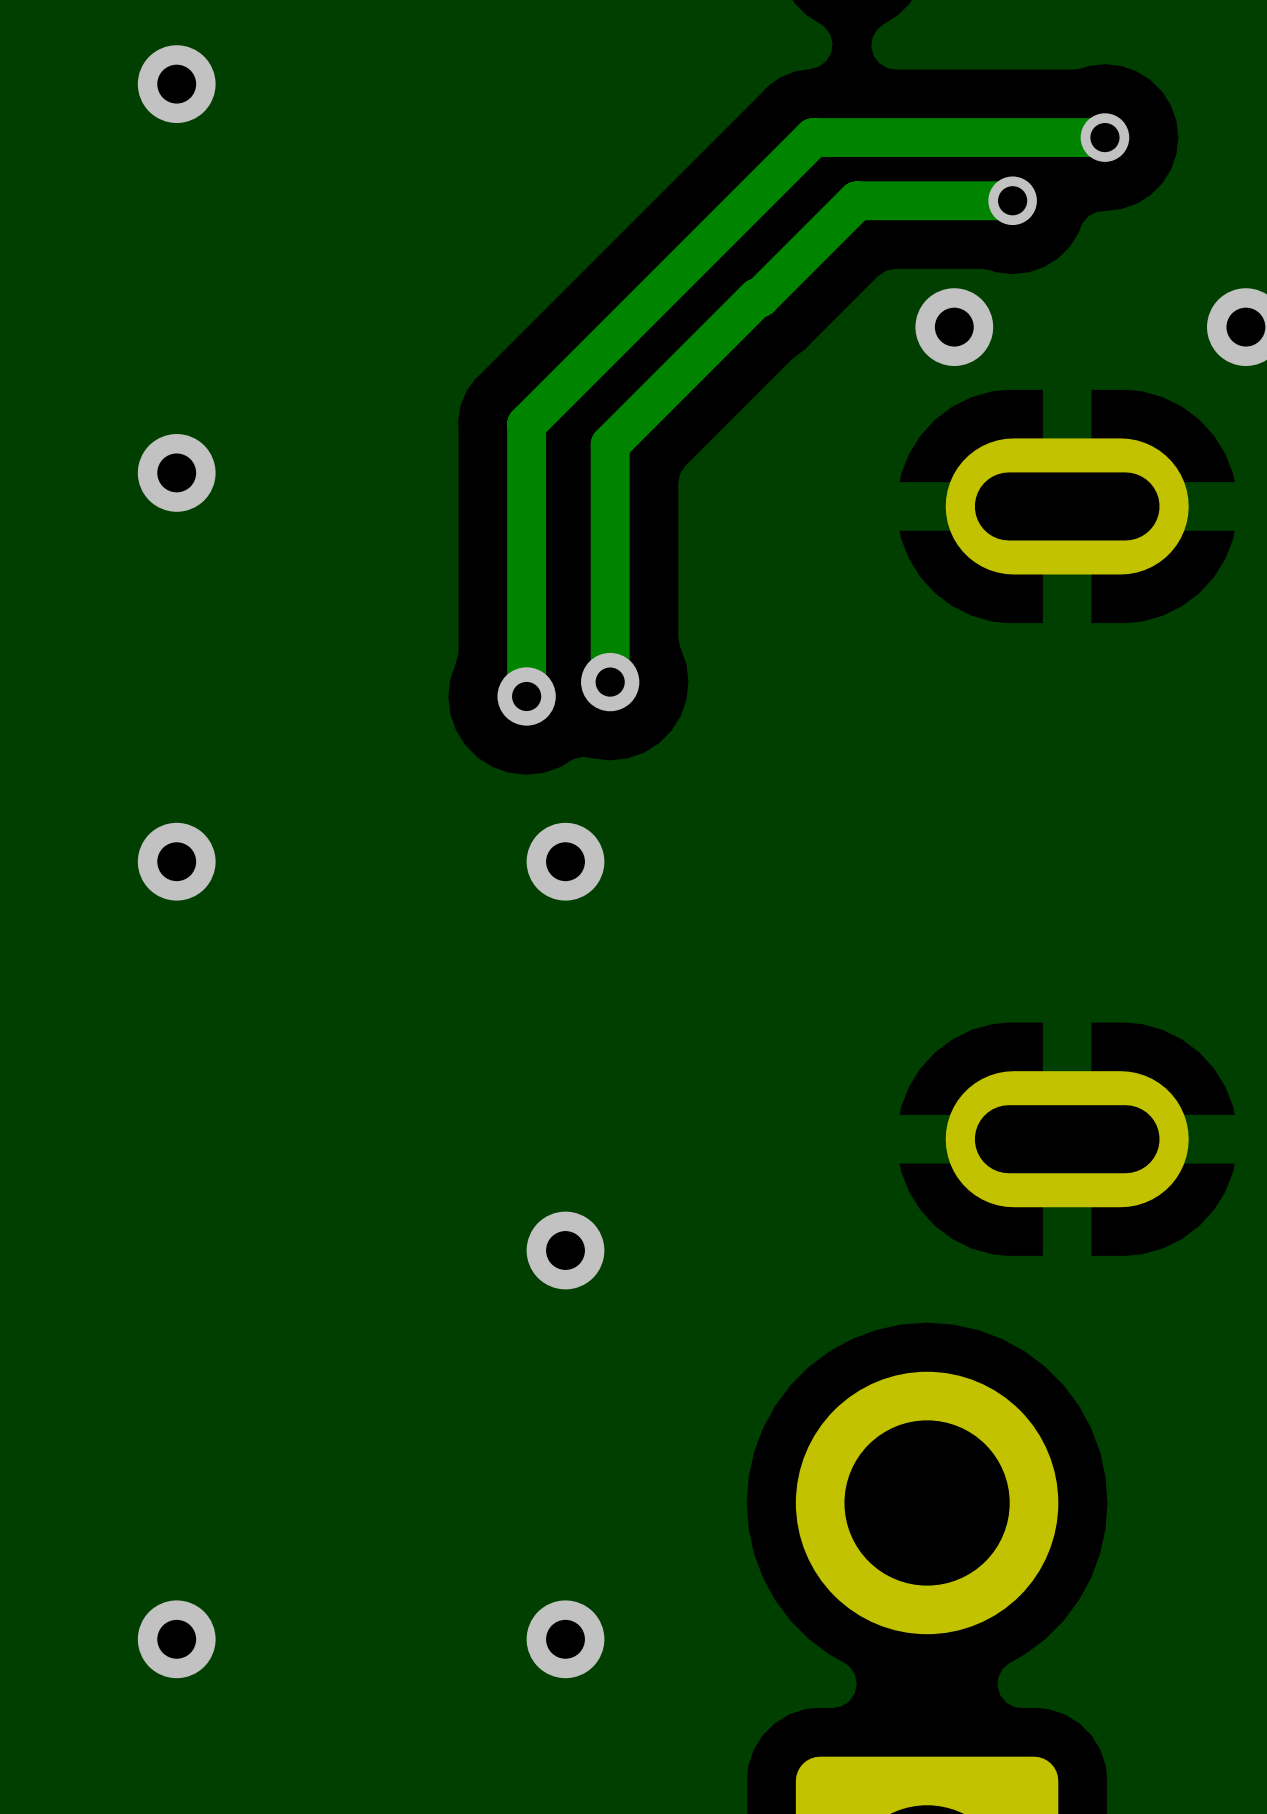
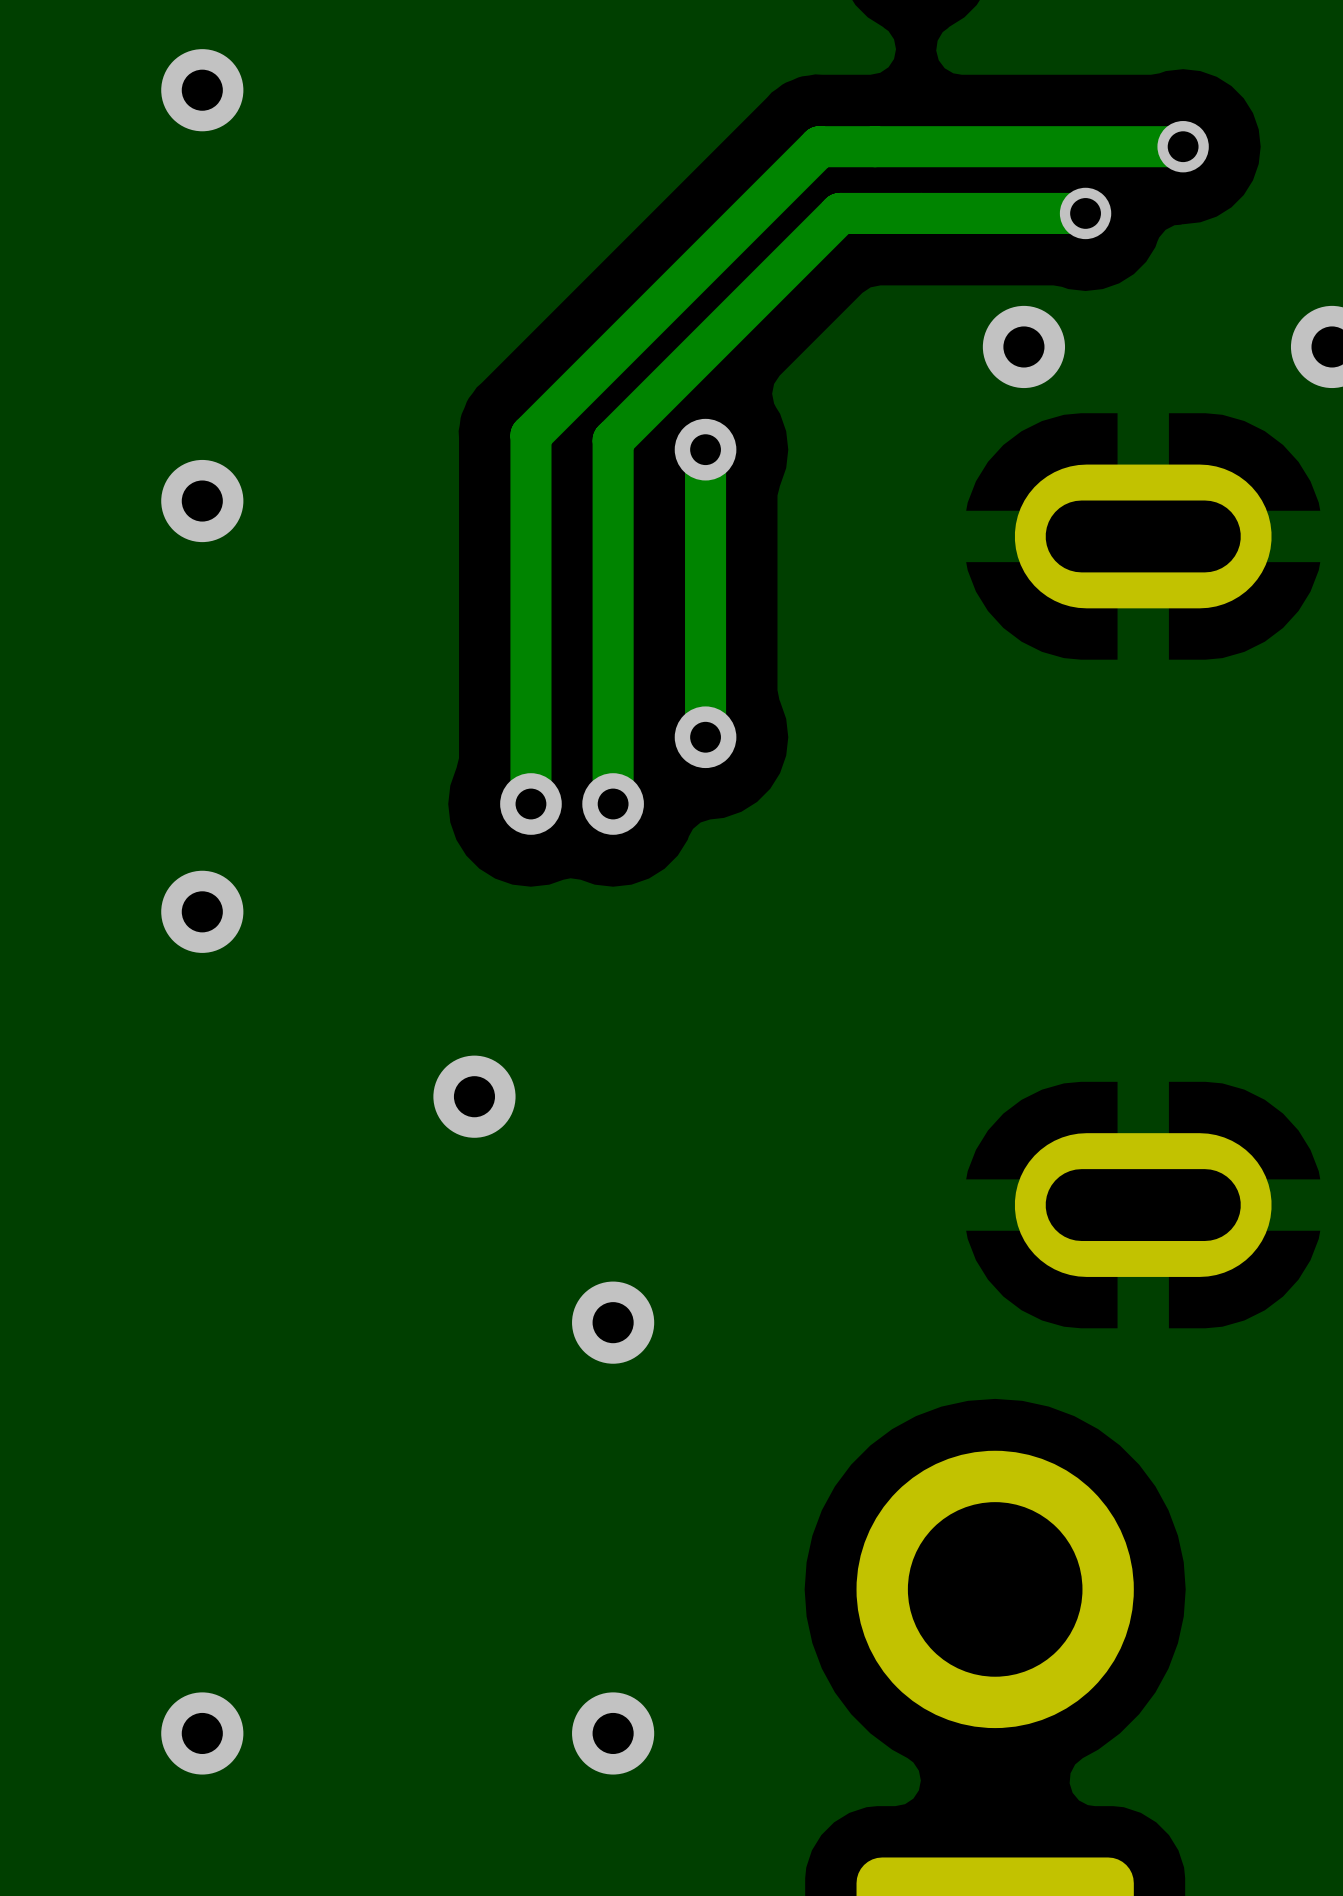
track: (813, 137) (526, 424) (526, 696) -> (875, 146) (819, 146) (530, 435) (530, 804)
track: (857, 200) (610, 444) (610, 682) -> (921, 213) (840, 213) (613, 440) (613, 804)
track: none -> (705, 449) (705, 737)
via: none -> (705, 449)
via position: (610, 682) -> (705, 737)
via: (526, 696) -> none
via: none -> (530, 804)
via: none -> (613, 804)
via position: (565, 861) -> (474, 1096)

